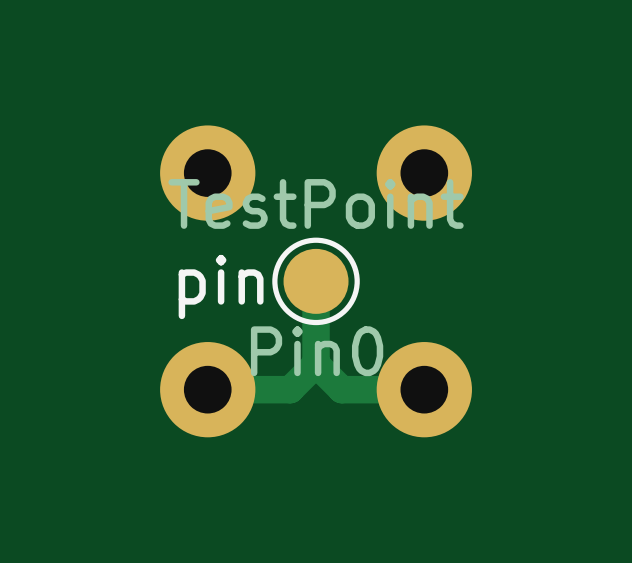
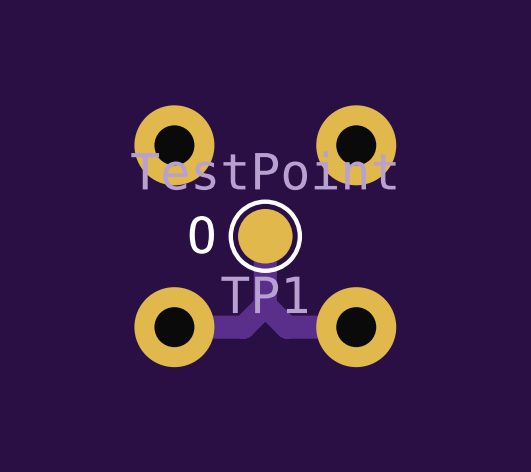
text: none -> O (201, 234)
text: pin (221, 286) -> none
Pin0 name: Pin0 (317, 351) -> TP1 (264, 294)

